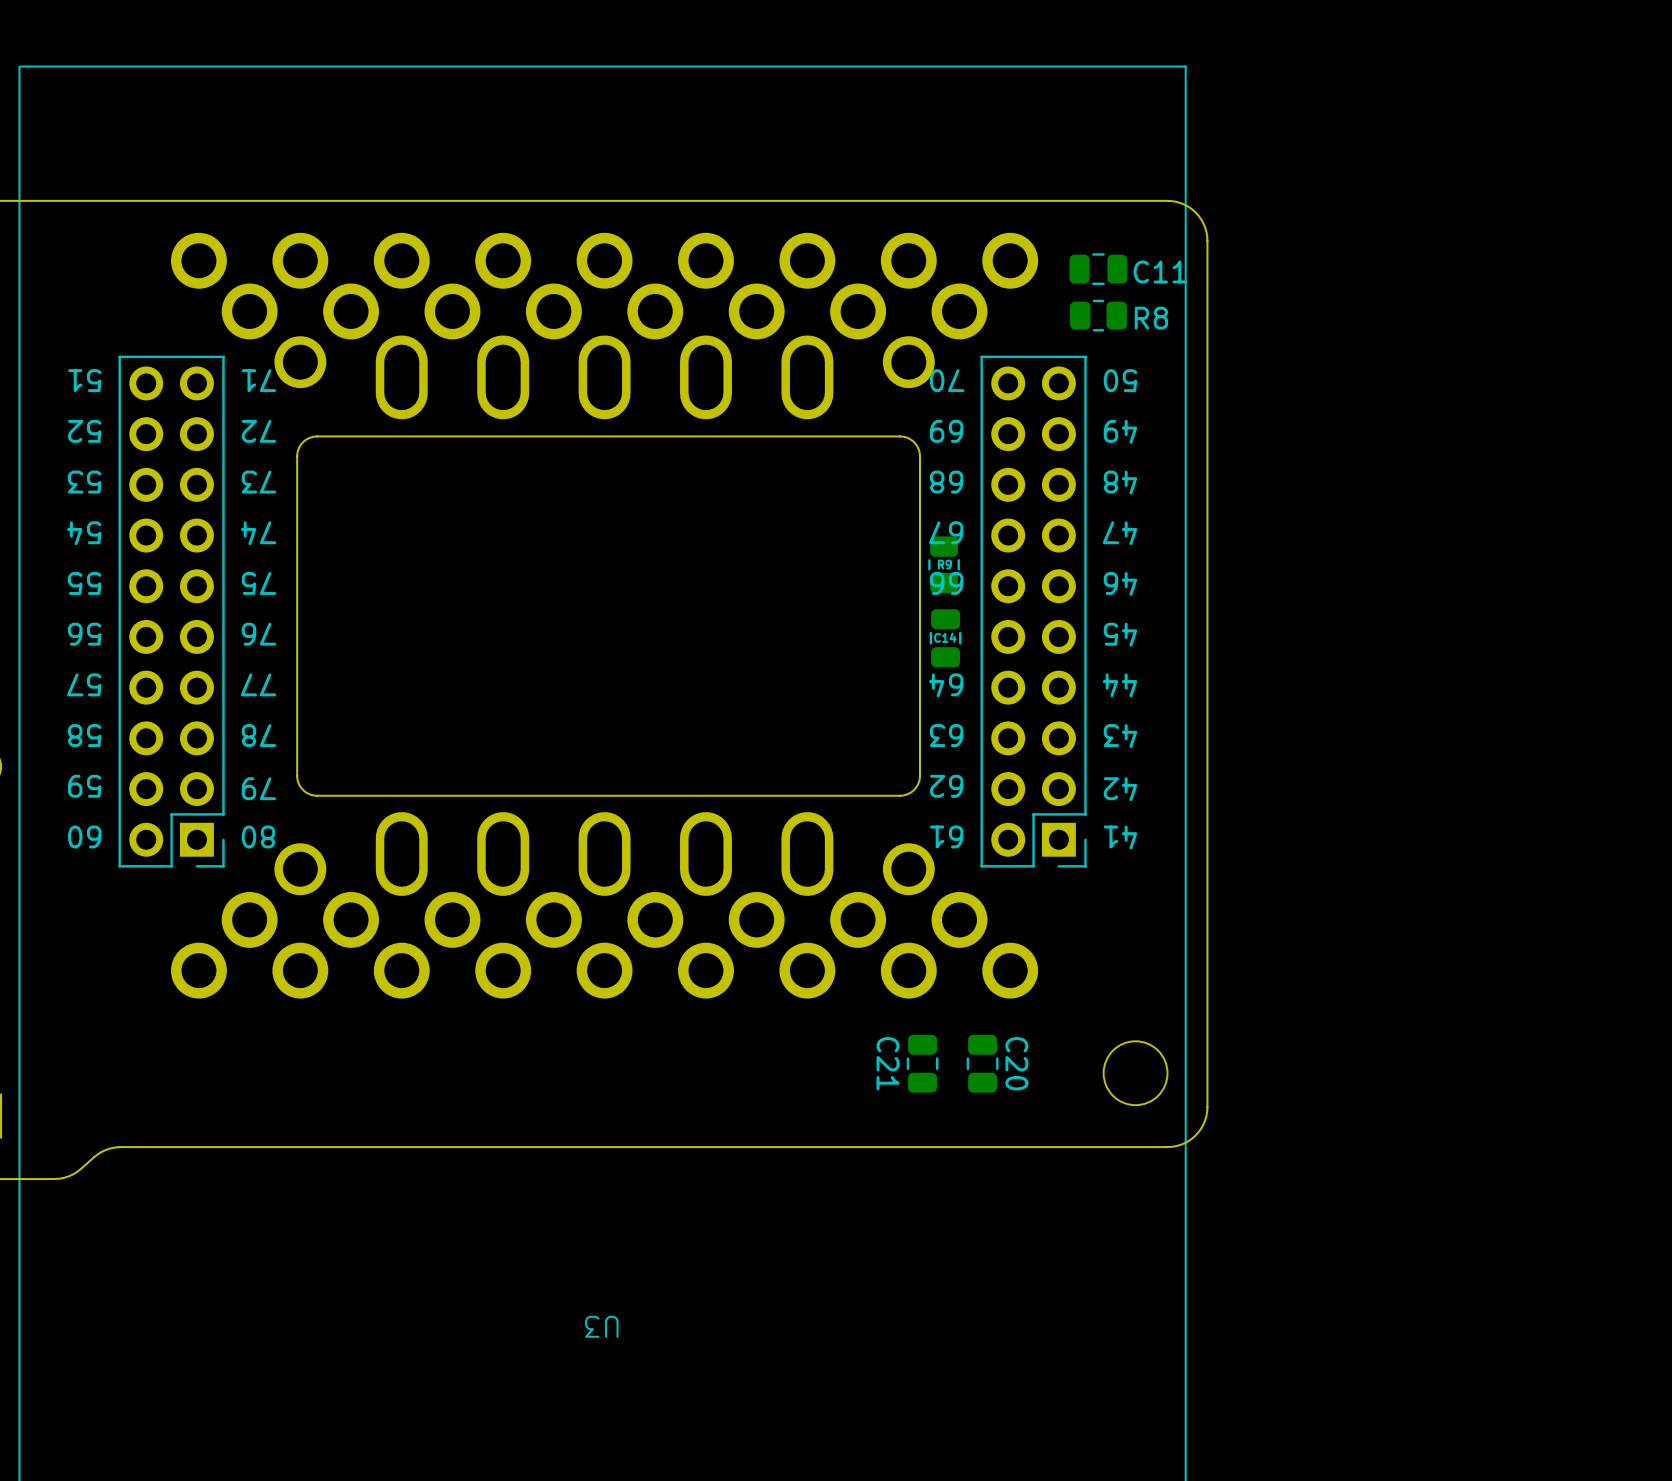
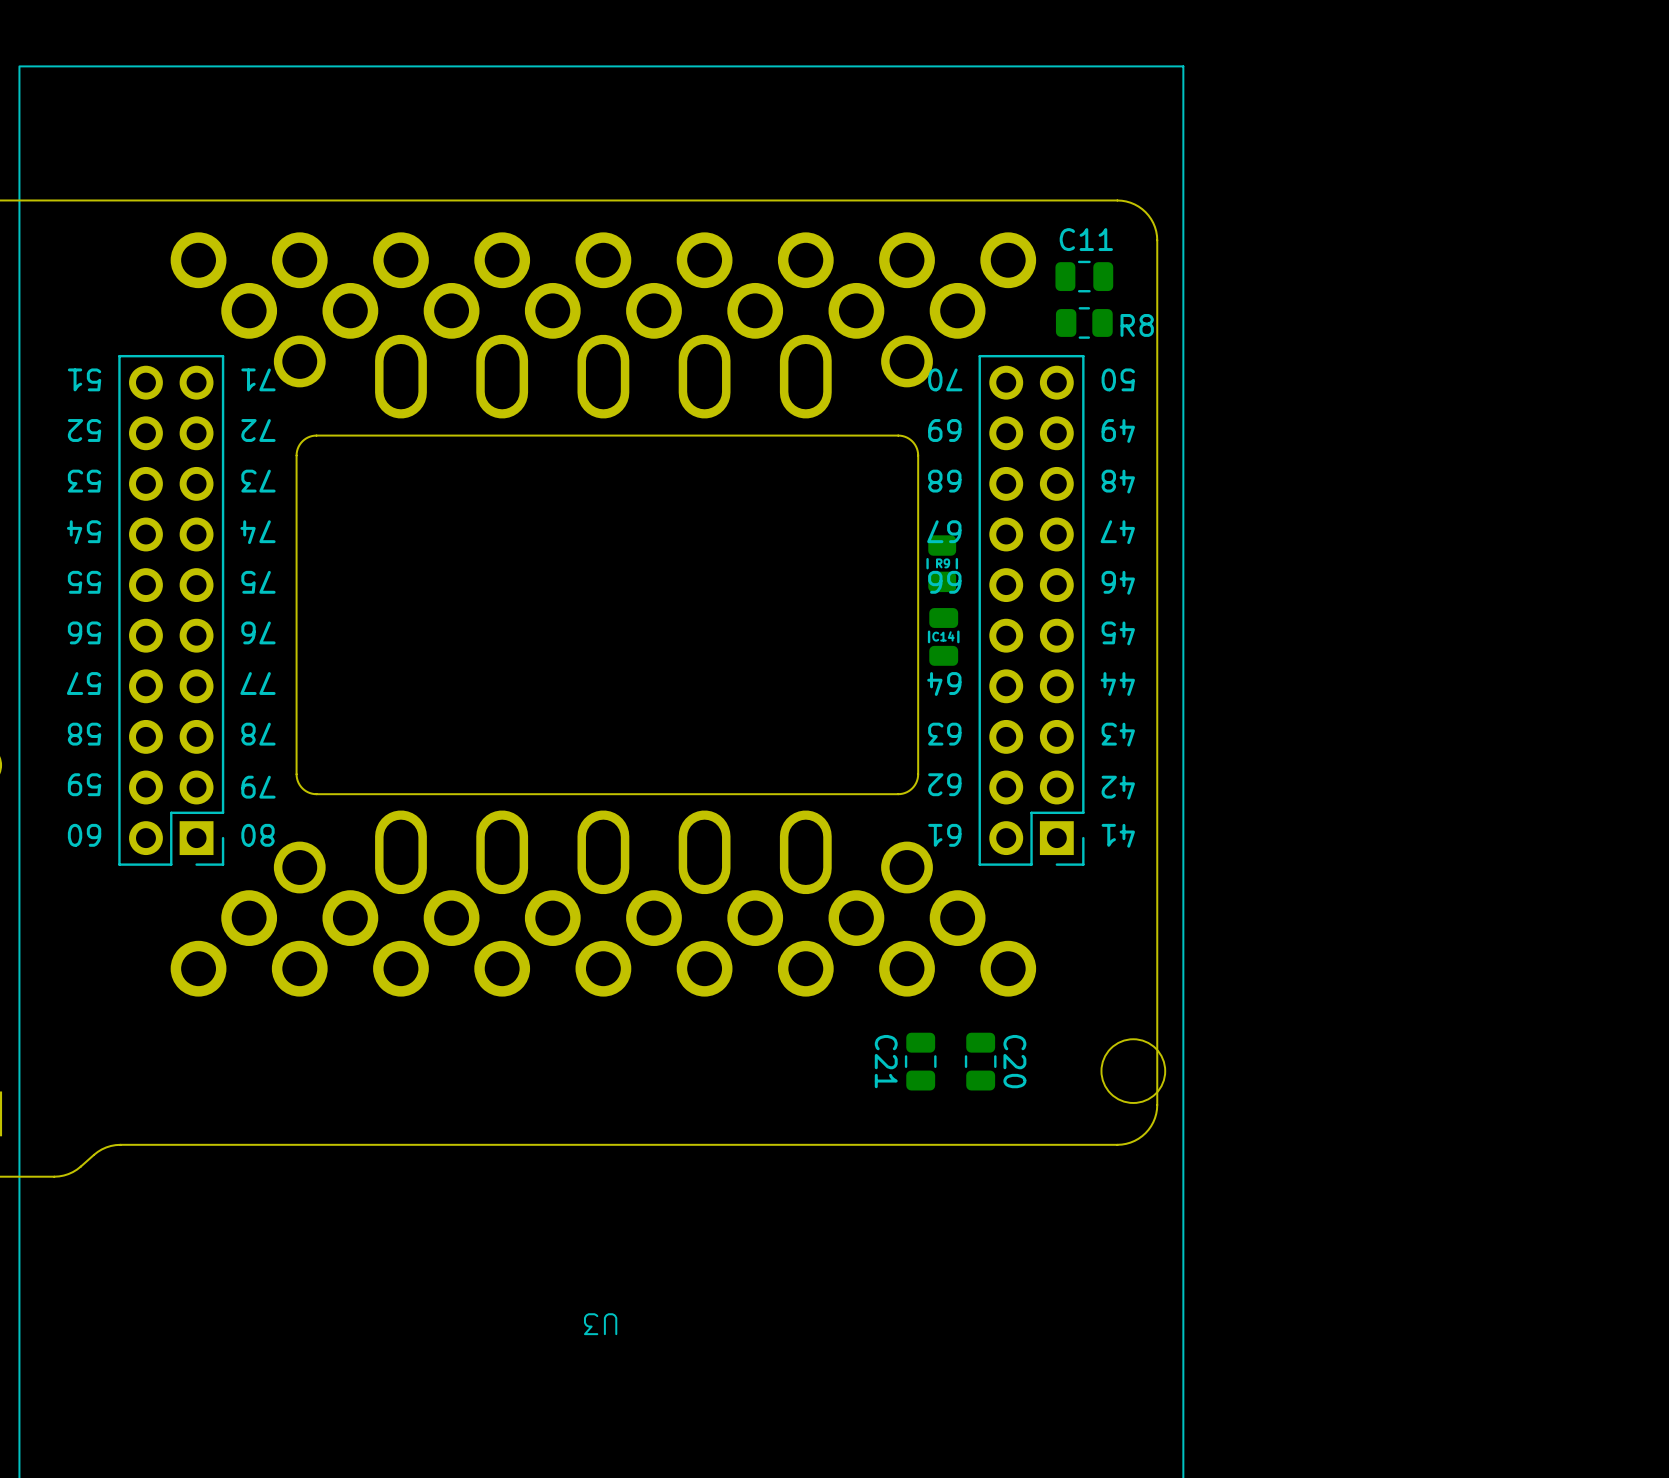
board edge: (1119, 200) (1171, 201) (1184, 204) (1201, 219) (1207, 240) (1207, 1111) (1198, 1132) (1180, 1144) (1167, 1147) (1119, 1147) -> (1117, 200) (1130, 202) (1145, 212) (1153, 223) (1157, 240) (1157, 1104) (1155, 1118) (1145, 1133) (1130, 1142) (1117, 1144)
C11 position: (1098, 269) -> (1084, 276)
C11 name position: C11 (1160, 271) -> C11 (1086, 239)
R8 position: (1098, 315) -> (1084, 322)

